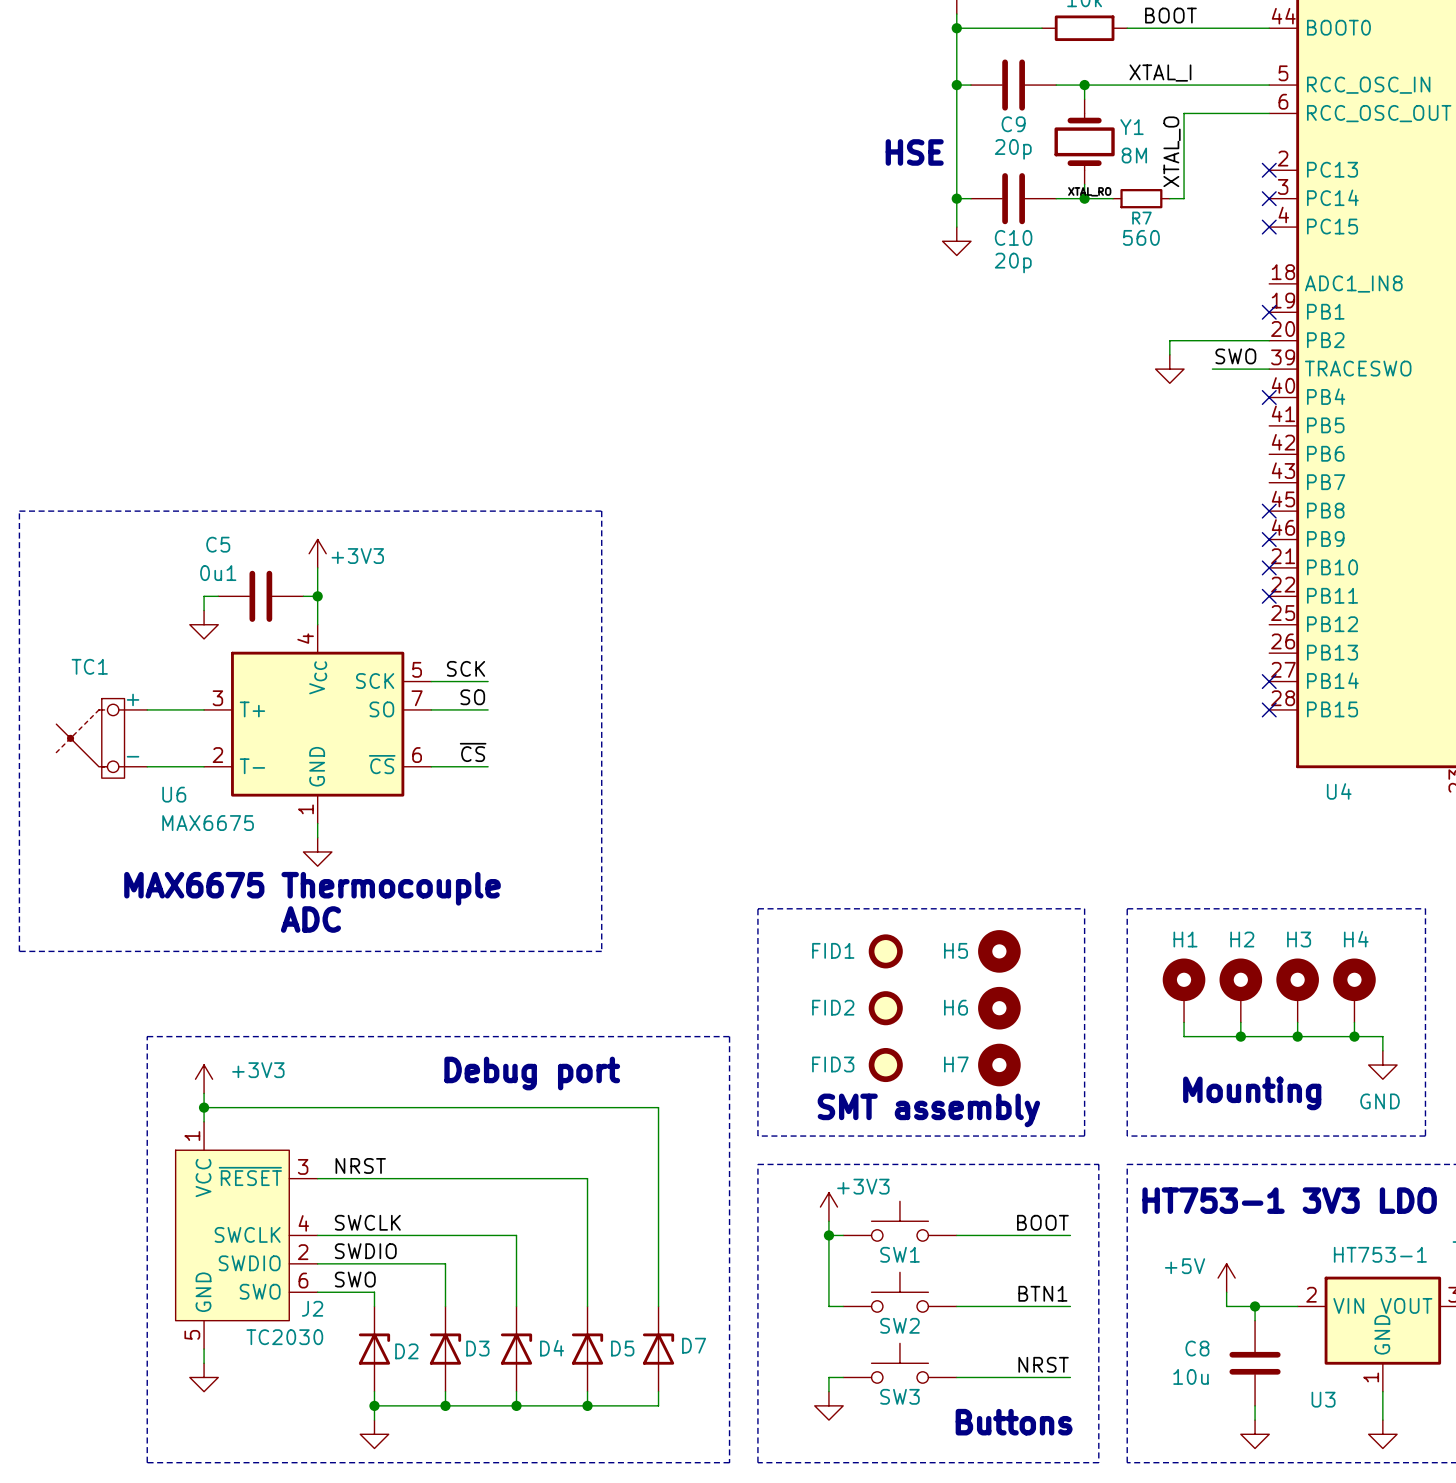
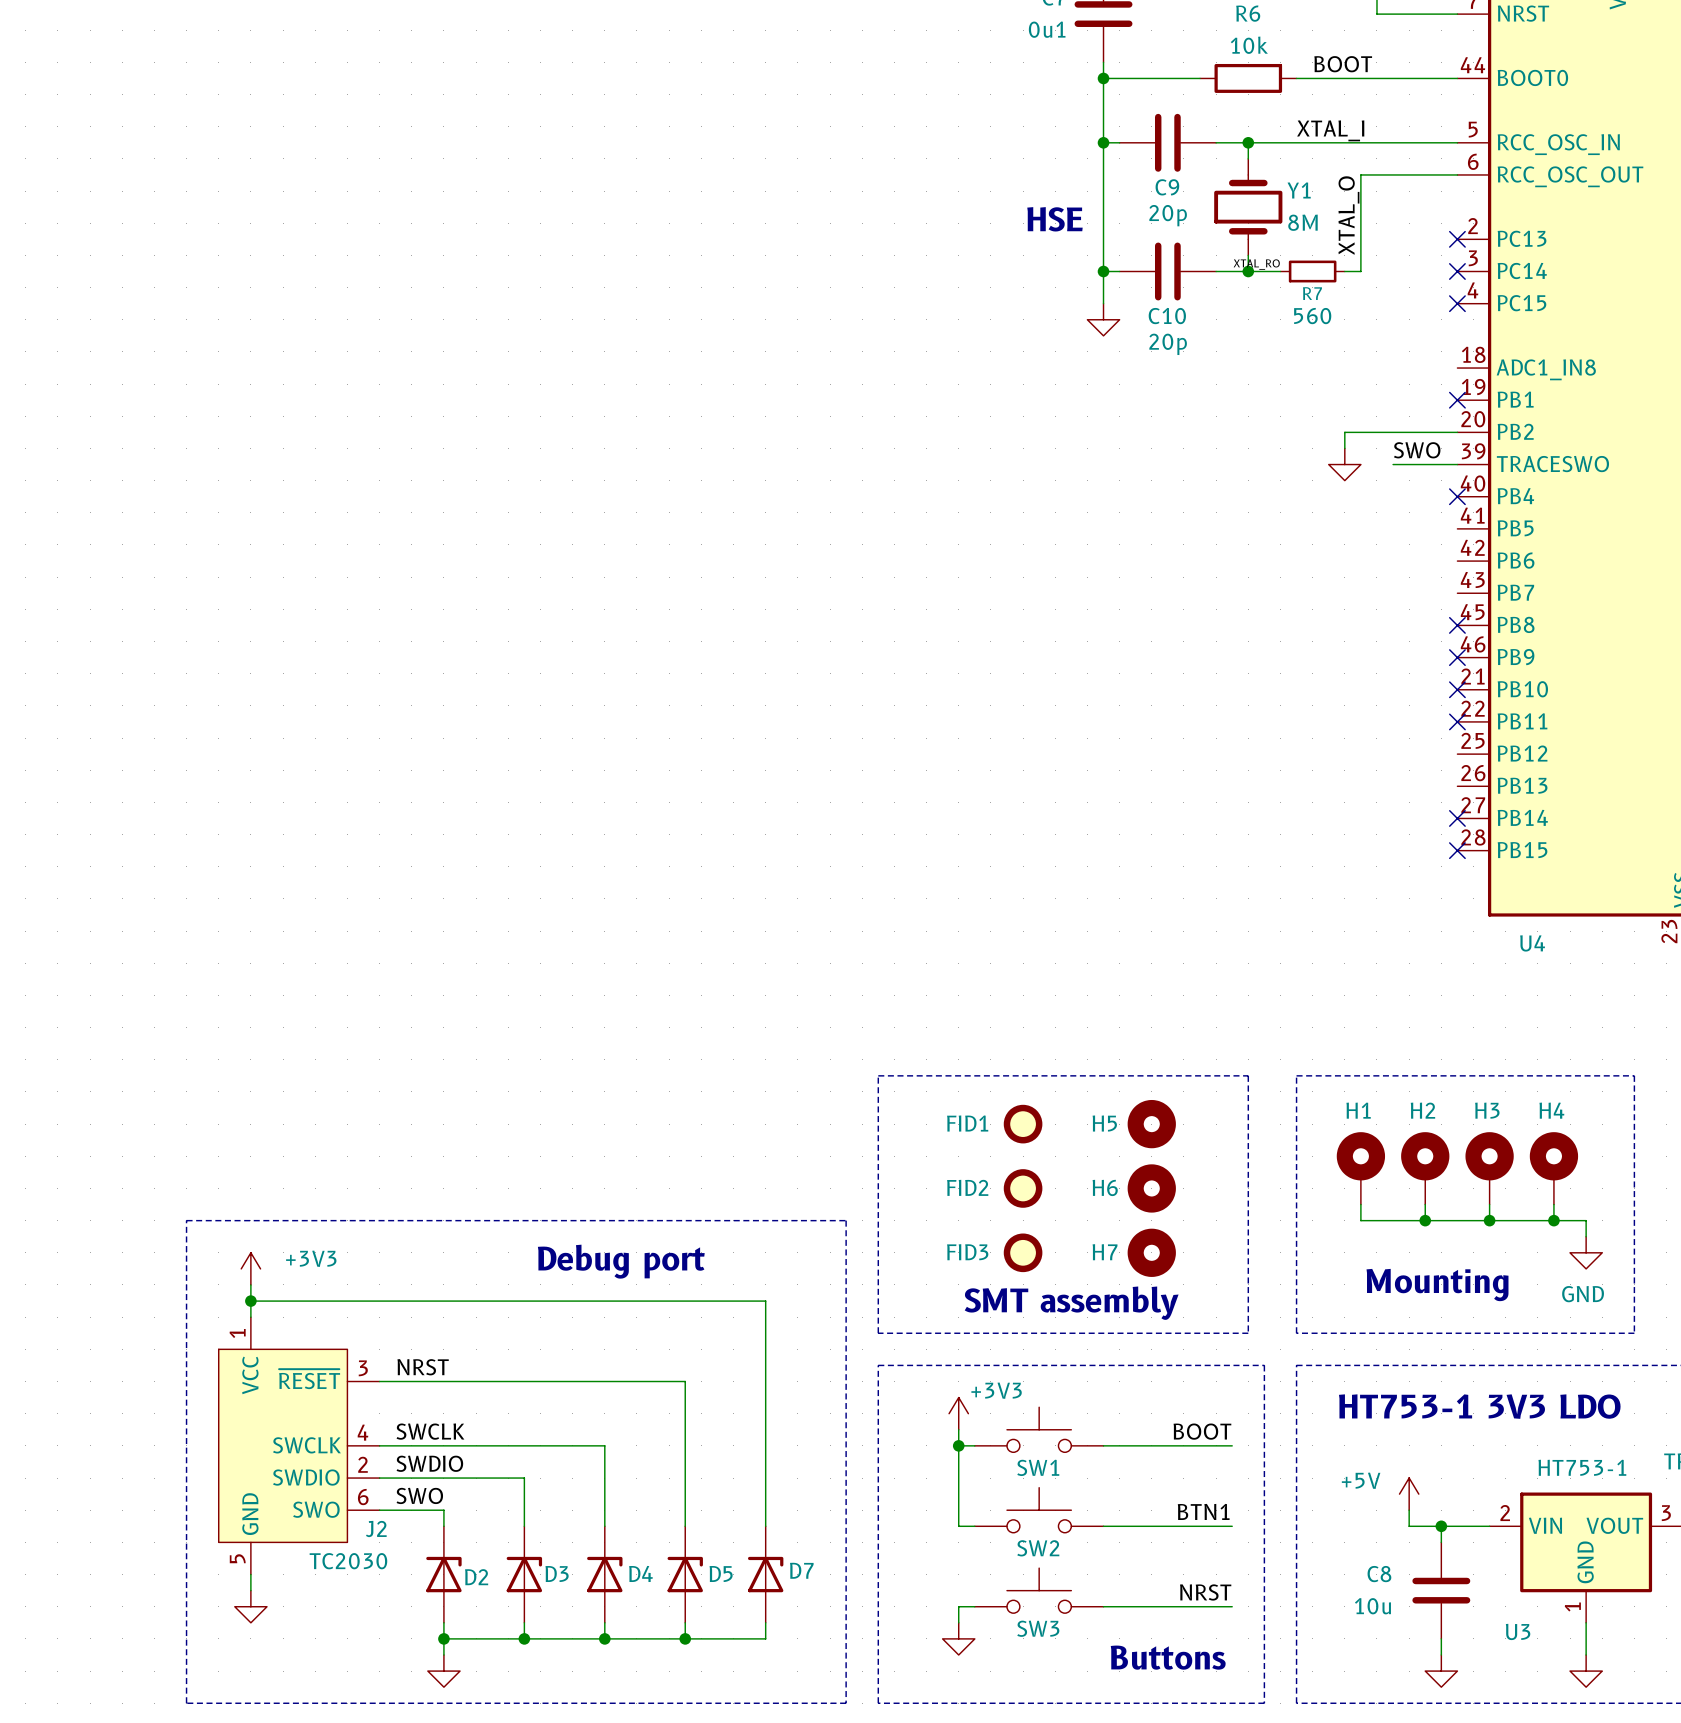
line: (19, 511) (601, 511) (601, 951) (19, 951) (19, 511) -> none
power symbol: +3V3 (317, 553) -> none
wire: (317, 567) (317, 624) -> none
wire: (218, 596) (204, 596) (204, 610) -> none
C5: 0u1 (260, 596) -> none
wire: (303, 596) (317, 596) -> none
junction: (317, 596) -> none
power symbol: (204, 624) -> none
label: SCK (466, 668) -> none
wire: (431, 681) (488, 681) -> none
label: SO (472, 697) -> none
wire: (147, 709) (204, 709) -> none
wire: (431, 709) (488, 709) -> none
U6: MAX6675 (317, 724) -> none
TC1: (101, 738) -> none
label: ~{CS} (473, 752) -> none
wire: (147, 766) (204, 766) -> none
wire: (431, 766) (488, 766) -> none
wire: (317, 823) (317, 837) -> none
power symbol: (317, 851) -> none
text: MAX6675 Thermocouple (312, 888) -> none
text: ADC (310, 919) -> none

